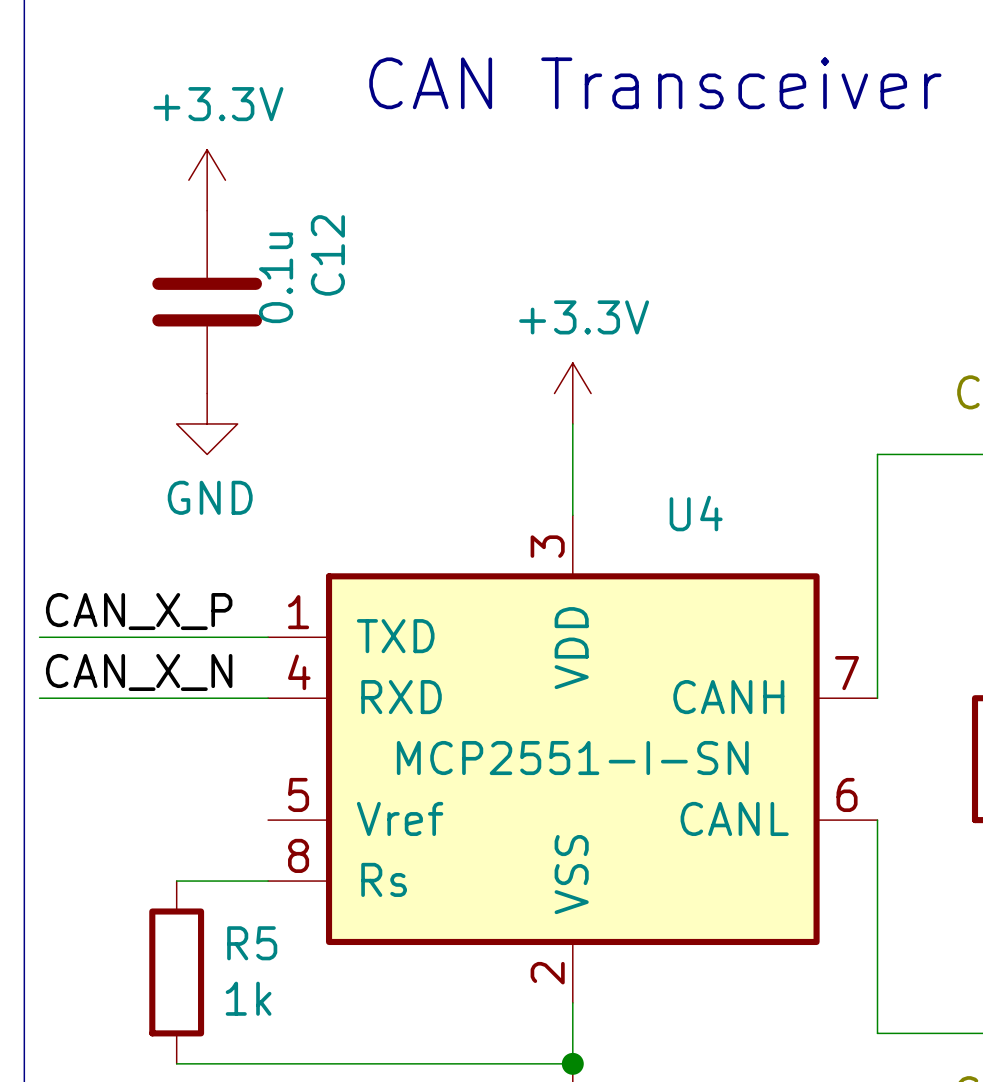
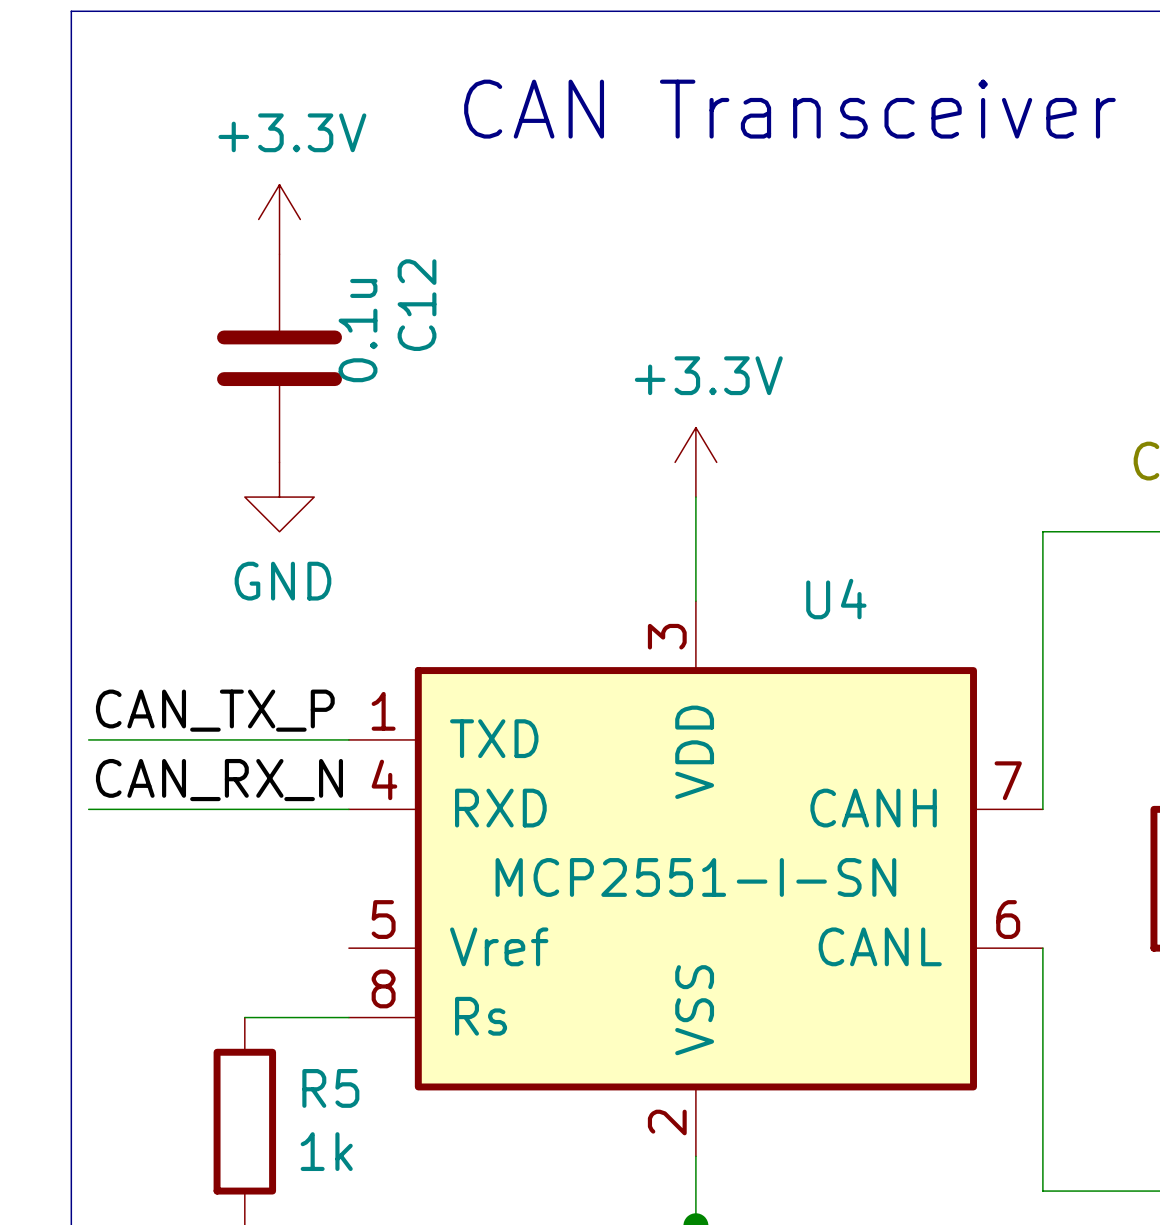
label: CAN_X_P (139, 611) -> CAN_TX_P (215, 710)
label: CAN_X_N (139, 672) -> CAN_RX_N (219, 780)

